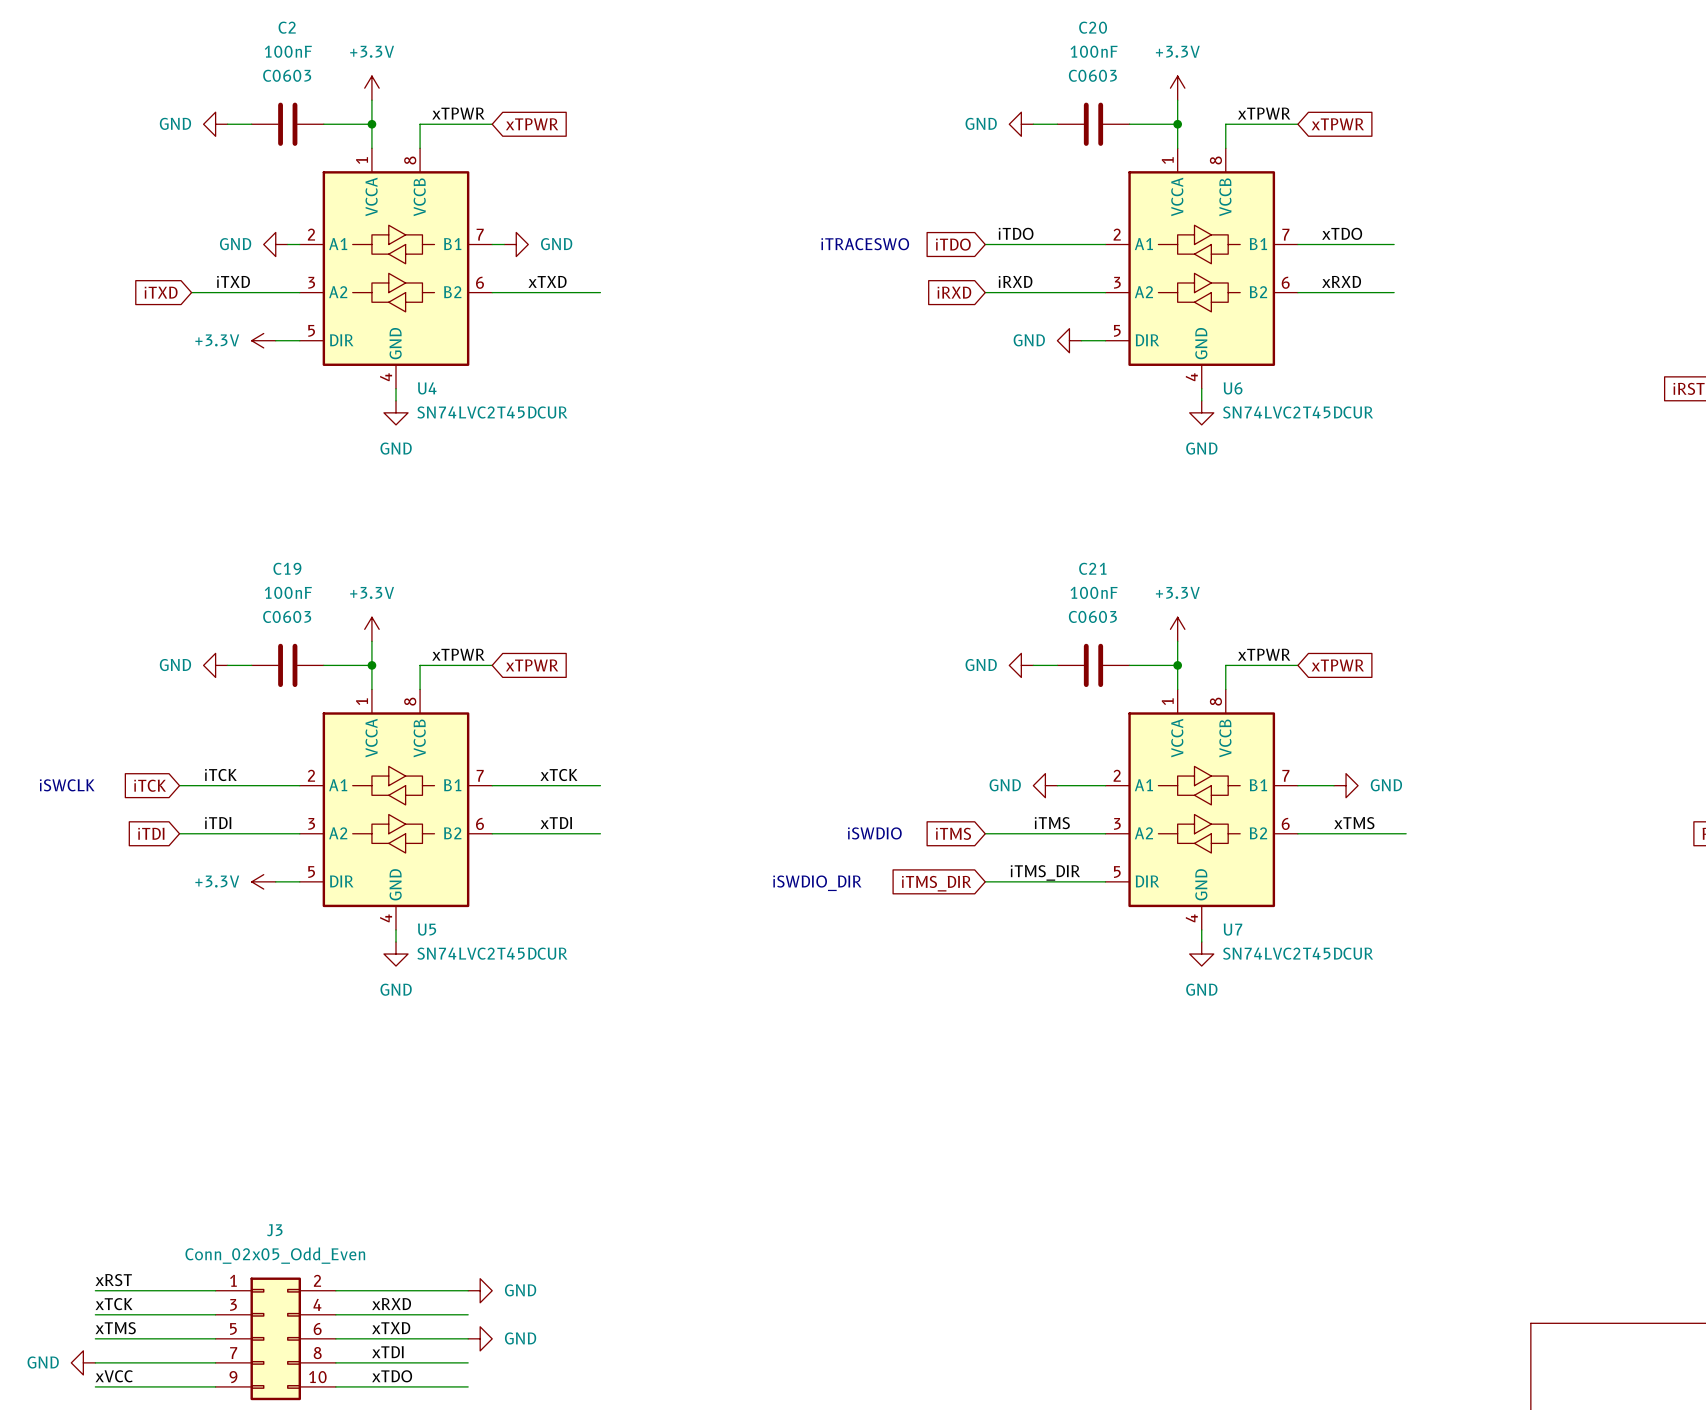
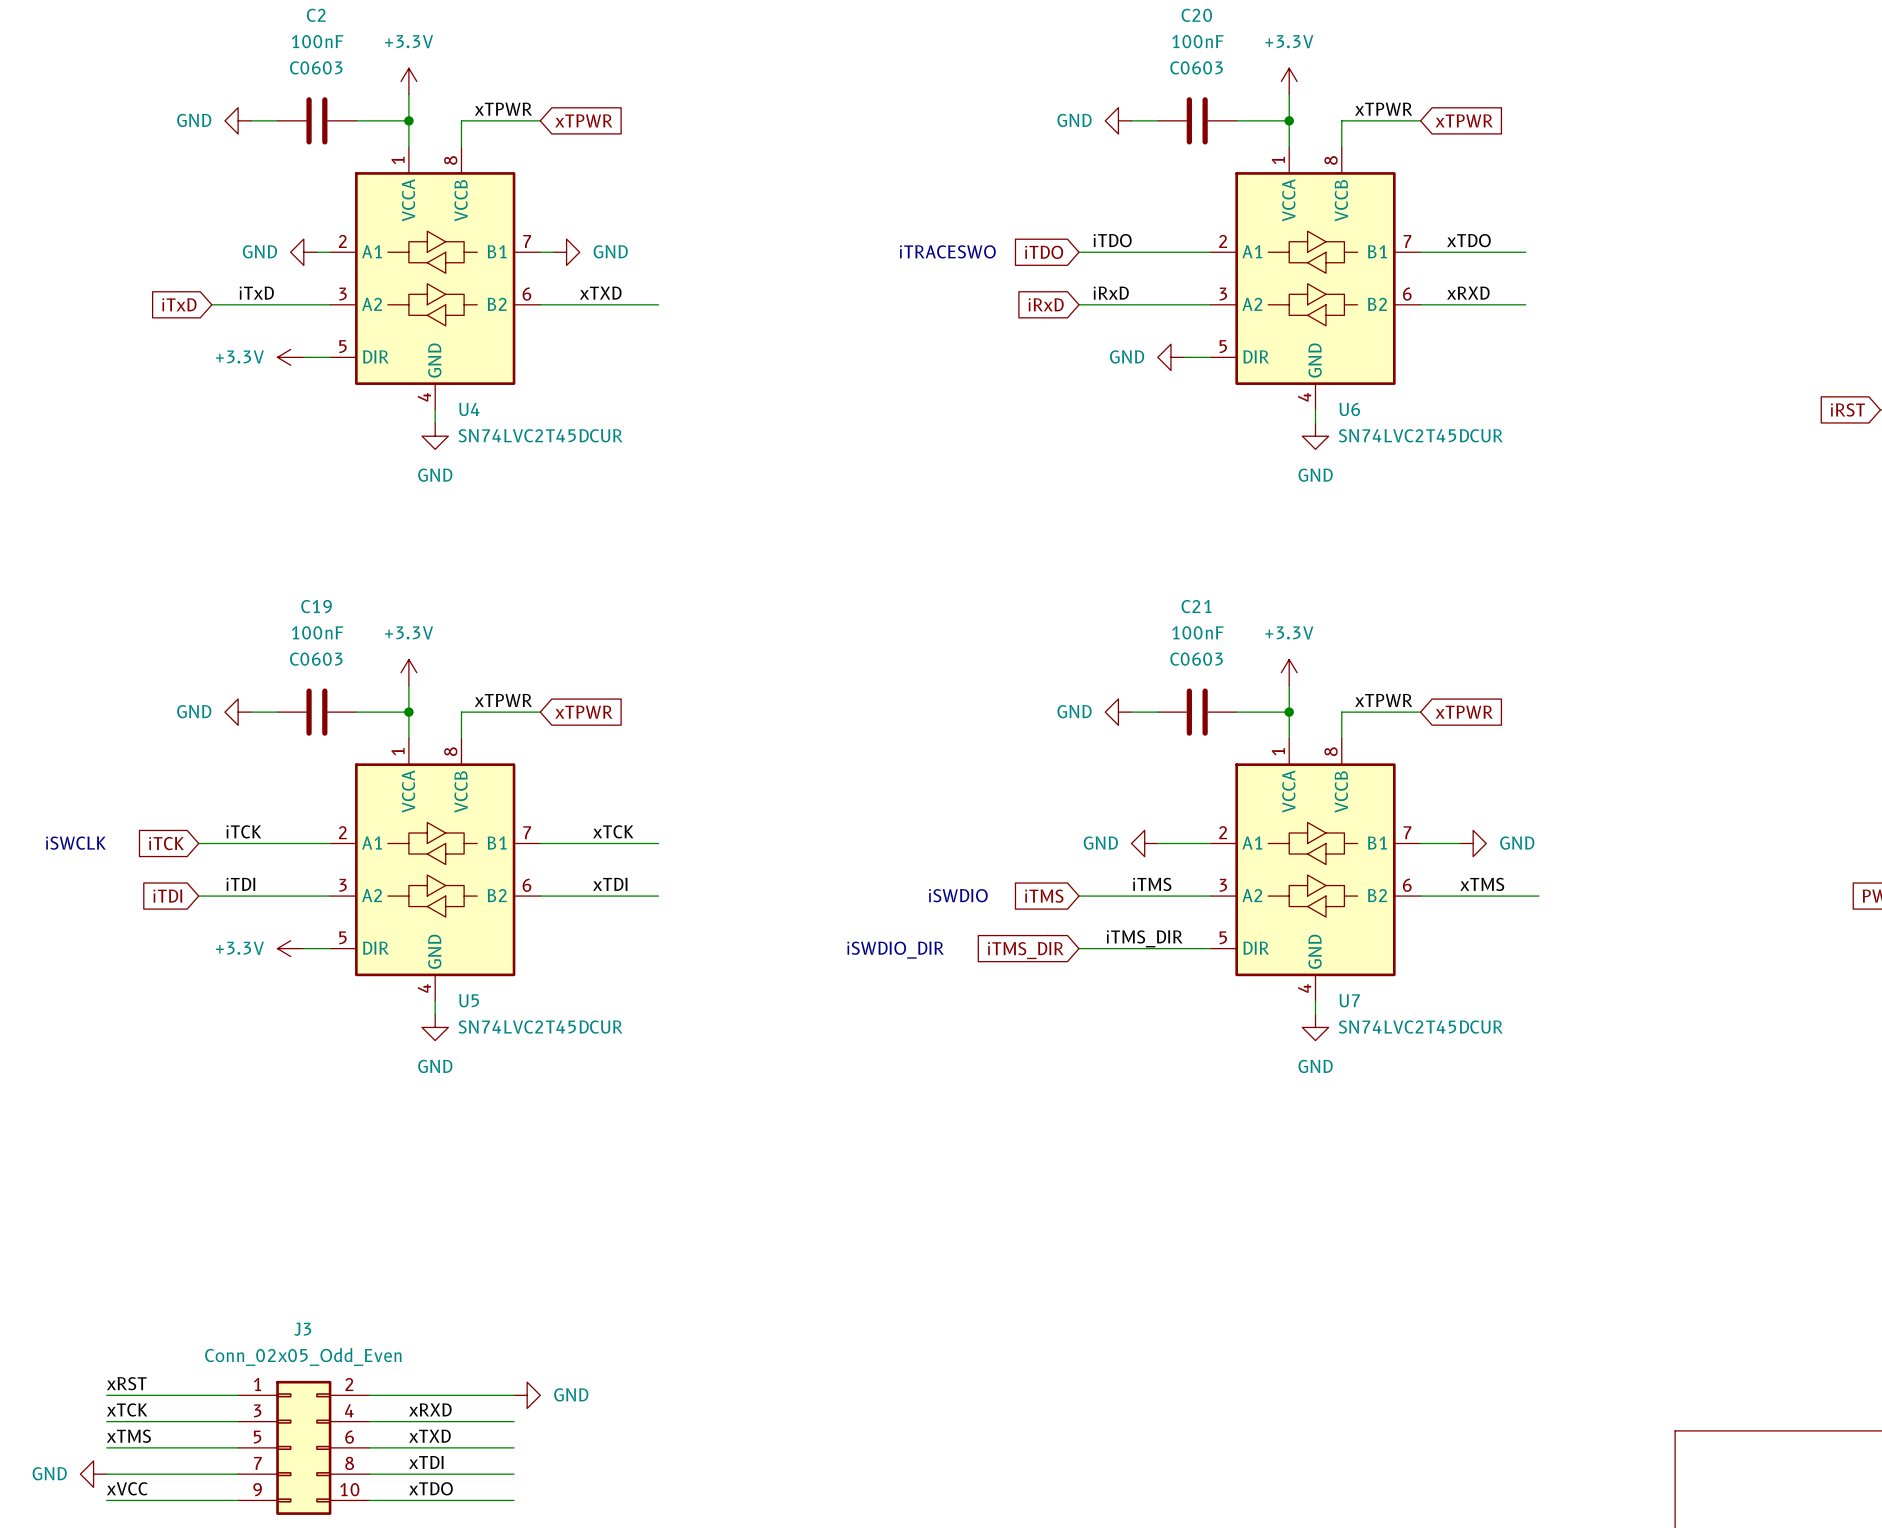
label: iTXD (233, 281) -> iTxD (256, 293)
label: iRXD (1015, 281) -> iRxD (1111, 293)
global label: iTXD (161, 292) -> iTxD (179, 304)
global label: iRXD (954, 292) -> iRxD (1046, 304)
power symbol: GND (480, 1338) -> none

